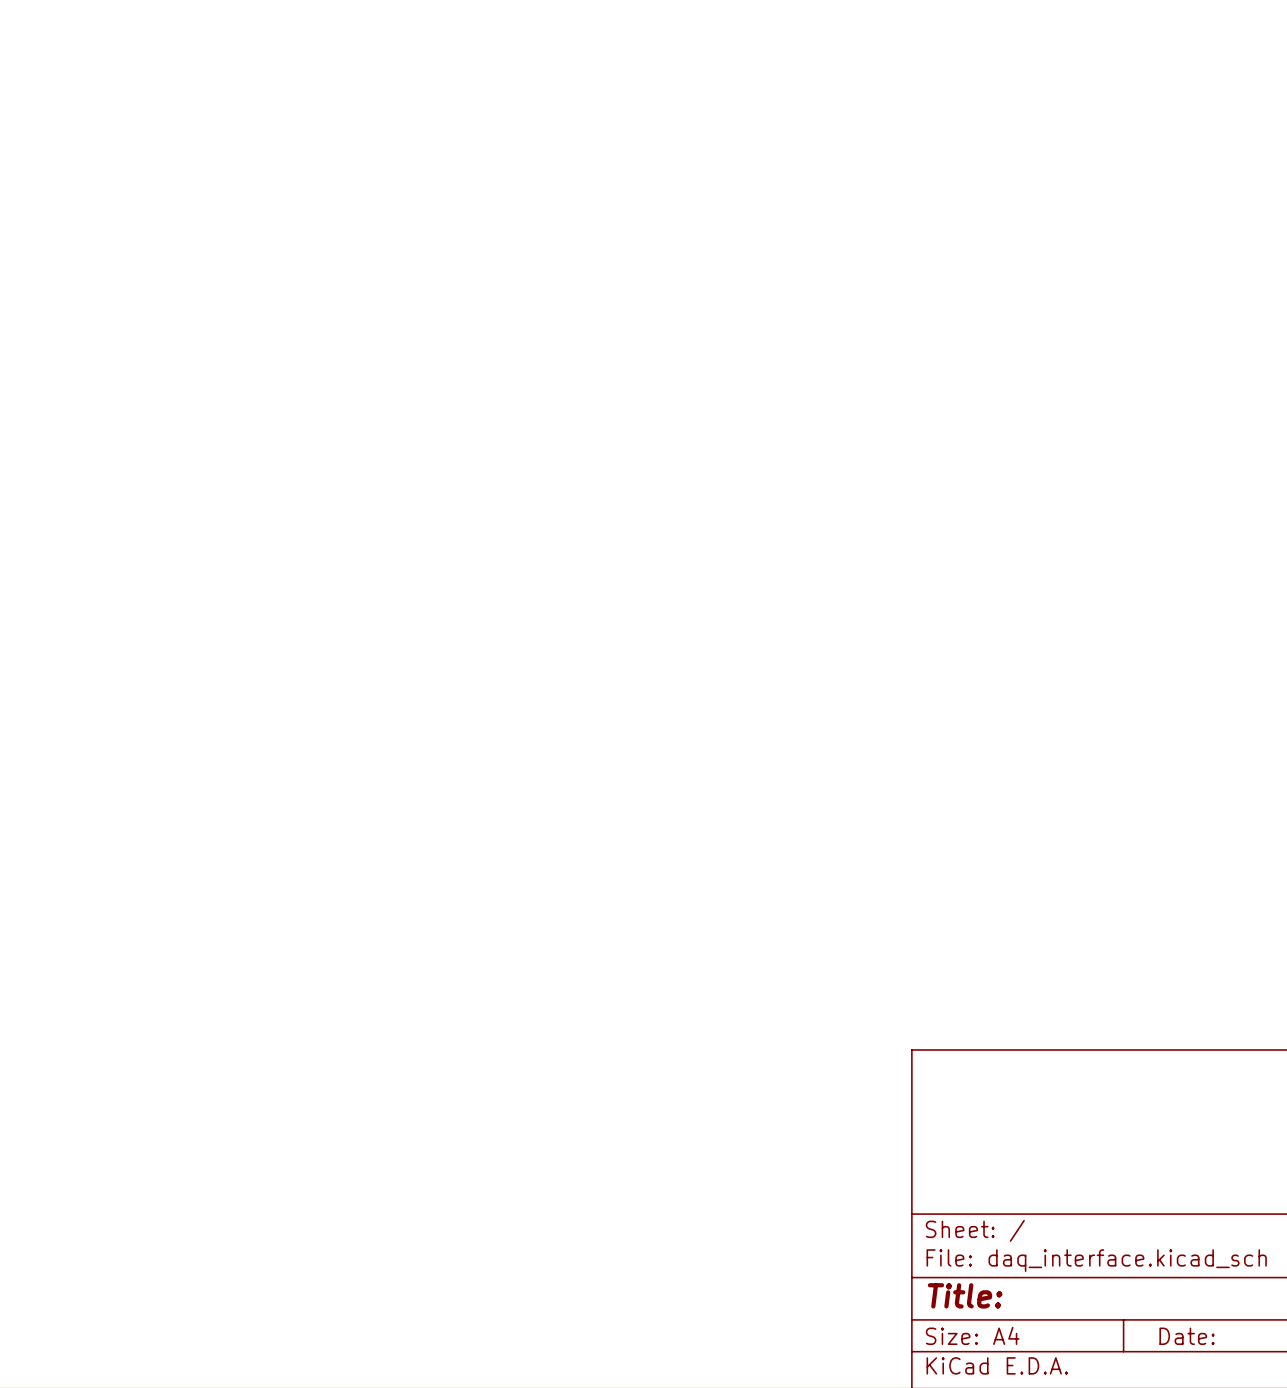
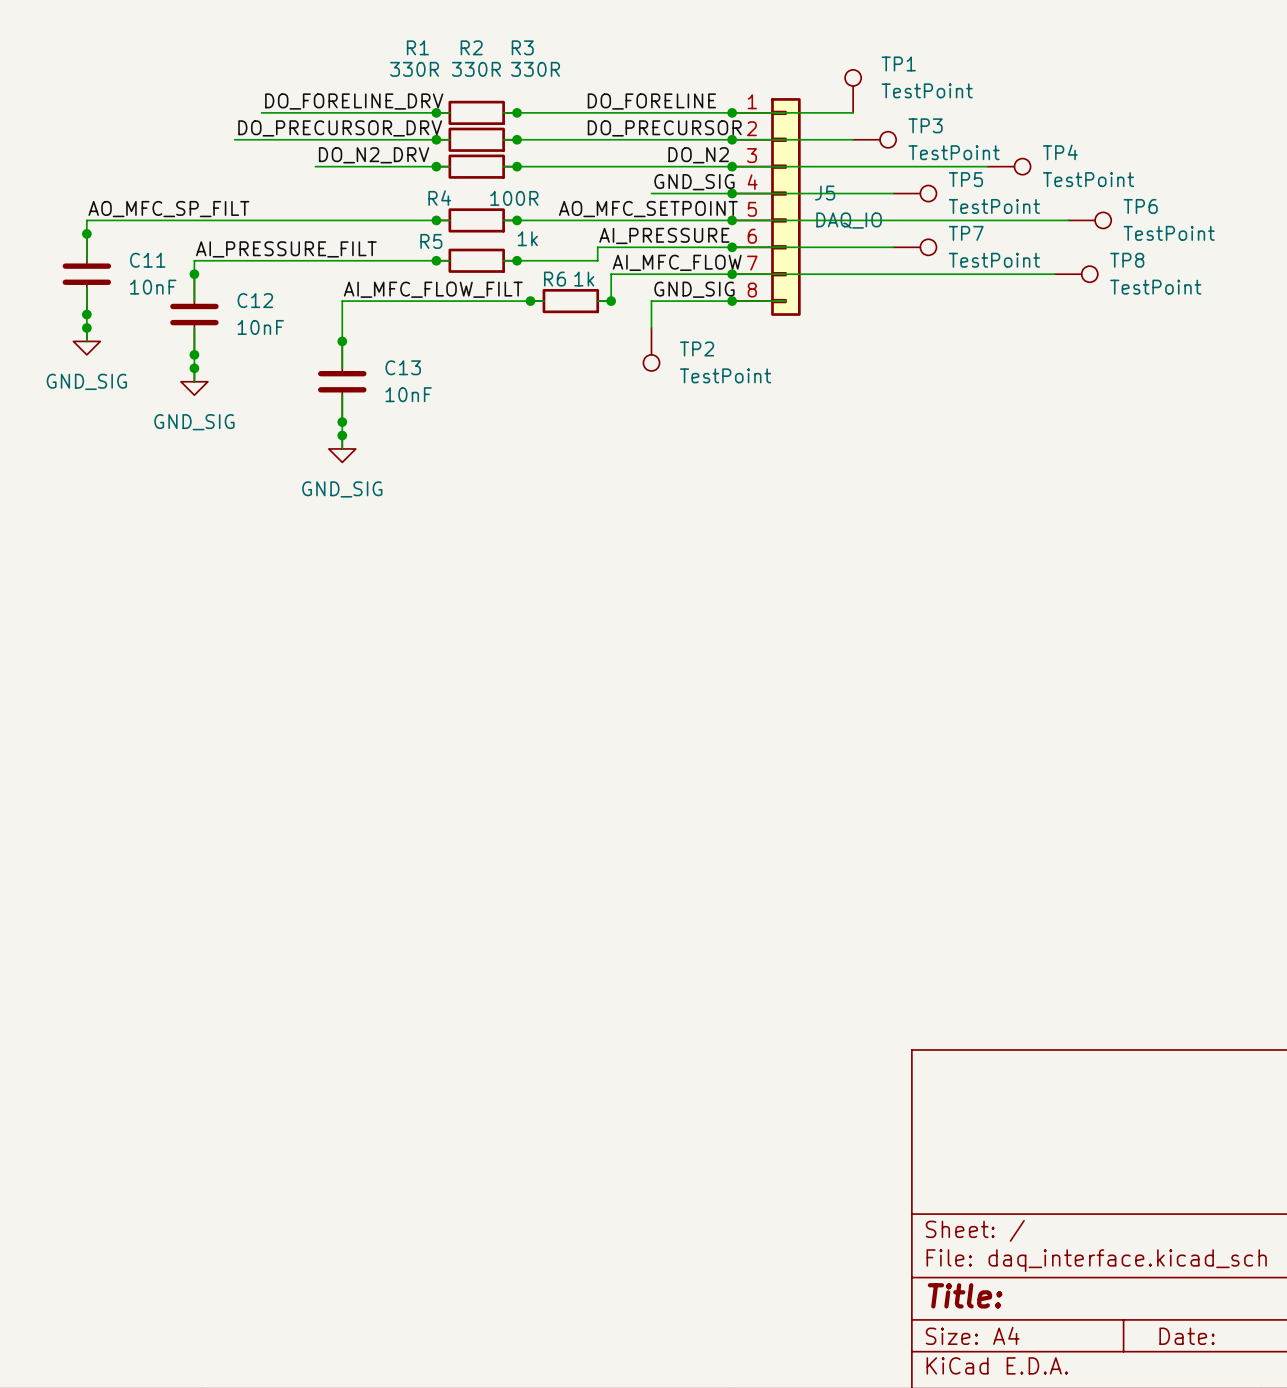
TP1: none -> TestPoint (853, 91)
label: none -> DO_FORELINE_DRV (354, 101)
label: none -> DO_FORELINE (651, 101)
wire: none -> (261, 112) (449, 112)
junction: none -> (436, 112)
R1: none -> 330R (476, 112)
wire: none -> (503, 112) (853, 112)
junction: none -> (517, 112)
junction: none -> (732, 112)
label: none -> DO_PRECURSOR_DRV (340, 128)
label: none -> DO_PRECURSOR (664, 128)
wire: none -> (234, 139) (449, 139)
junction: none -> (436, 139)
R2: none -> 330R (476, 139)
wire: none -> (503, 139) (853, 139)
junction: none -> (517, 139)
junction: none -> (732, 139)
TP3: none -> TestPoint (874, 139)
label: none -> DO_N2_DRV (374, 155)
label: none -> DO_N2 (698, 155)
wire: none -> (315, 166) (449, 166)
junction: none -> (436, 166)
R3: none -> 330R (476, 166)
wire: none -> (503, 166) (987, 166)
junction: none -> (517, 166)
junction: none -> (732, 166)
TP4: none -> TestPoint (1009, 166)
label: none -> GND_SIG (694, 182)
wire: none -> (651, 193) (893, 193)
junction: none -> (732, 193)
TP5: none -> TestPoint (914, 193)
J5: none -> DAQ_IO (766, 206)
label: none -> AO_MFC_SP_FILT (168, 209)
label: none -> AO_MFC_SETPOINT (648, 209)
junction: none -> (436, 220)
wire: none -> (449, 220) (86, 220) (86, 260)
R4: none -> 100R (476, 220)
wire: none -> (503, 220) (1068, 220)
junction: none -> (517, 220)
junction: none -> (732, 220)
TP6: none -> TestPoint (1089, 220)
junction: none -> (86, 233)
label: none -> AI_PRESSURE (664, 235)
junction: none -> (732, 247)
wire: none -> (893, 247) (597, 247) (597, 260) (503, 260)
TP7: none -> TestPoint (914, 247)
label: none -> AI_PRESSURE_FILT (286, 249)
junction: none -> (436, 260)
wire: none -> (449, 260) (194, 260) (194, 301)
R5: none -> 1k (476, 260)
junction: none -> (517, 260)
label: none -> AI_MFC_FLOW (677, 262)
C11: none -> 10nF (86, 274)
junction: none -> (194, 274)
junction: none -> (732, 274)
wire: none -> (1054, 274) (611, 274) (611, 301) (597, 301)
TP8: none -> TestPoint (1076, 274)
wire: none -> (86, 287) (86, 341)
label: none -> AI_MFC_FLOW_FILT (433, 289)
label: none -> GND_SIG (694, 289)
junction: none -> (530, 301)
wire: none -> (543, 301) (342, 301) (342, 368)
R6: none -> 1k (570, 301)
junction: none -> (611, 301)
junction: none -> (732, 301)
wire: none -> (785, 301) (651, 301) (651, 327)
junction: none -> (86, 314)
C12: none -> 10nF (194, 314)
junction: none -> (86, 327)
wire: none -> (194, 327) (194, 381)
power symbol: none -> GND_SIG (86, 341)
junction: none -> (342, 341)
TP2: none -> TestPoint (651, 349)
junction: none -> (194, 354)
junction: none -> (194, 368)
power symbol: none -> GND_SIG (194, 381)
C13: none -> 10nF (342, 381)
wire: none -> (342, 395) (342, 448)
junction: none -> (342, 422)
junction: none -> (342, 435)
power symbol: none -> GND_SIG (342, 448)

